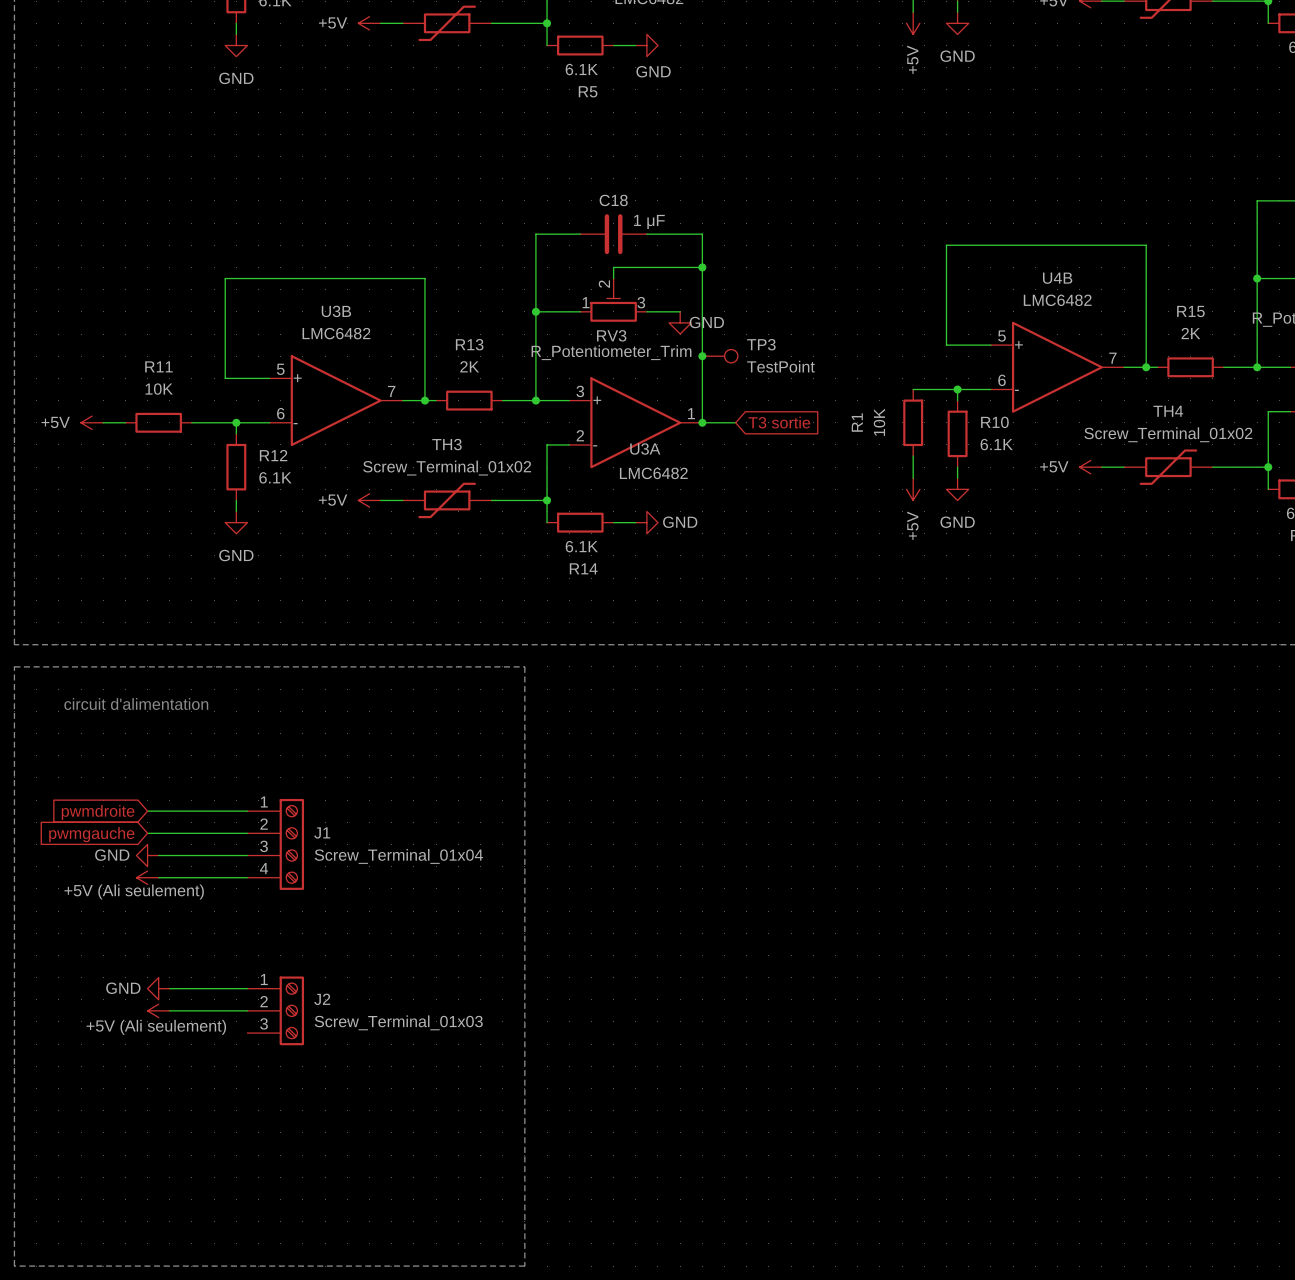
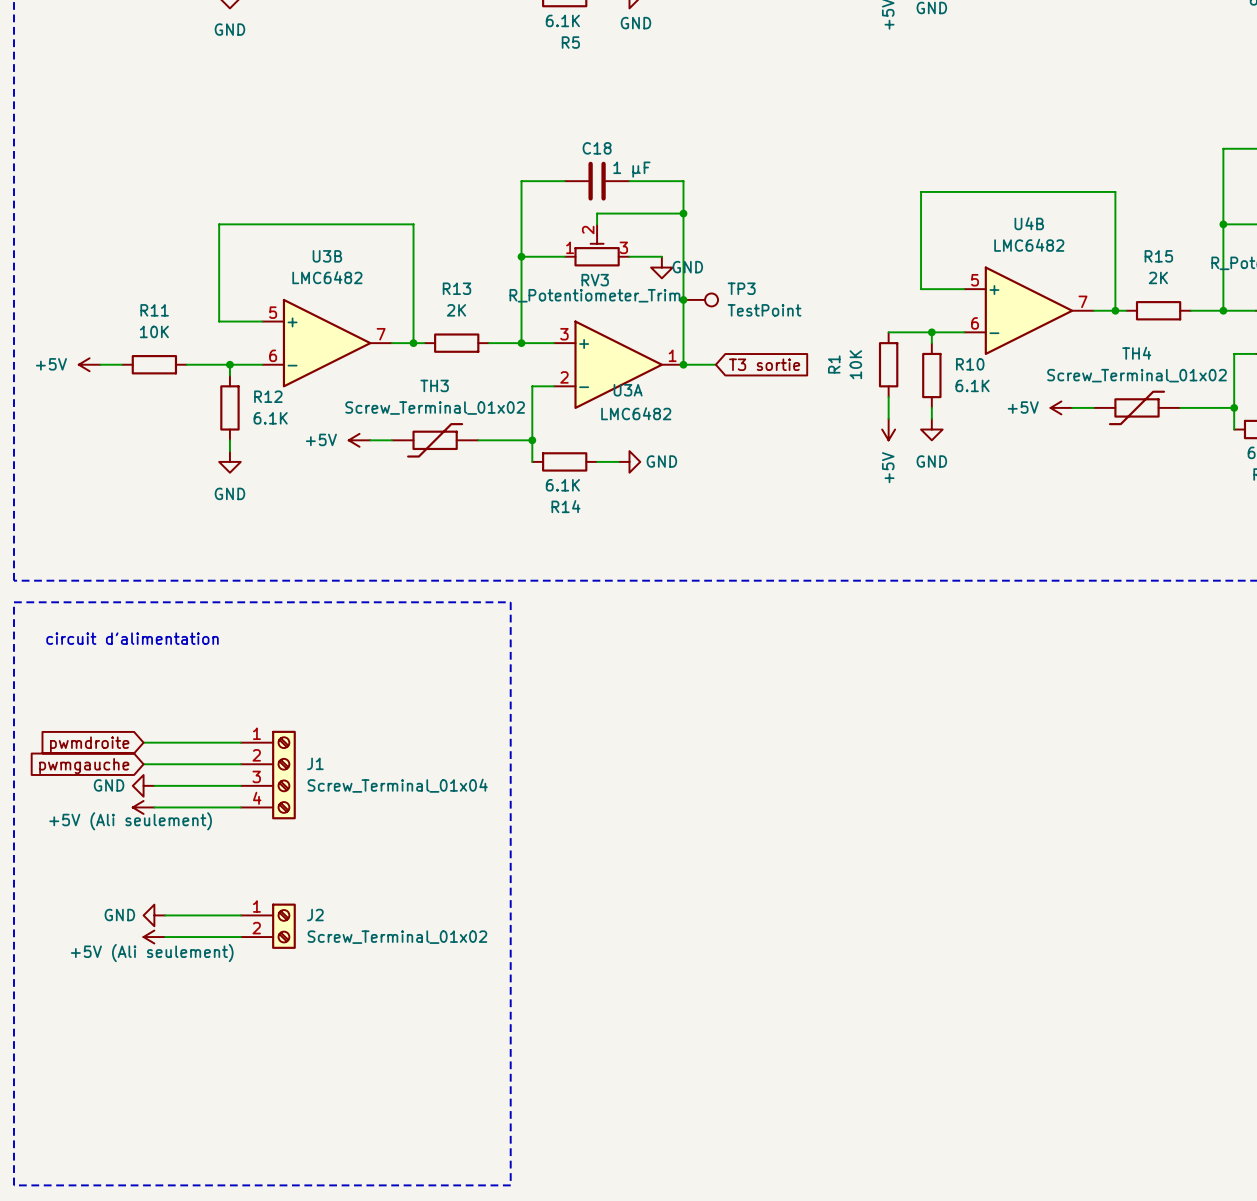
J2 symbol: [247, 976, 305, 1046] -> [240, 903, 296, 949]
J2 value: Screw_Terminal_01x03 (398, 1022) -> Screw_Terminal_01x02 (397, 937)

